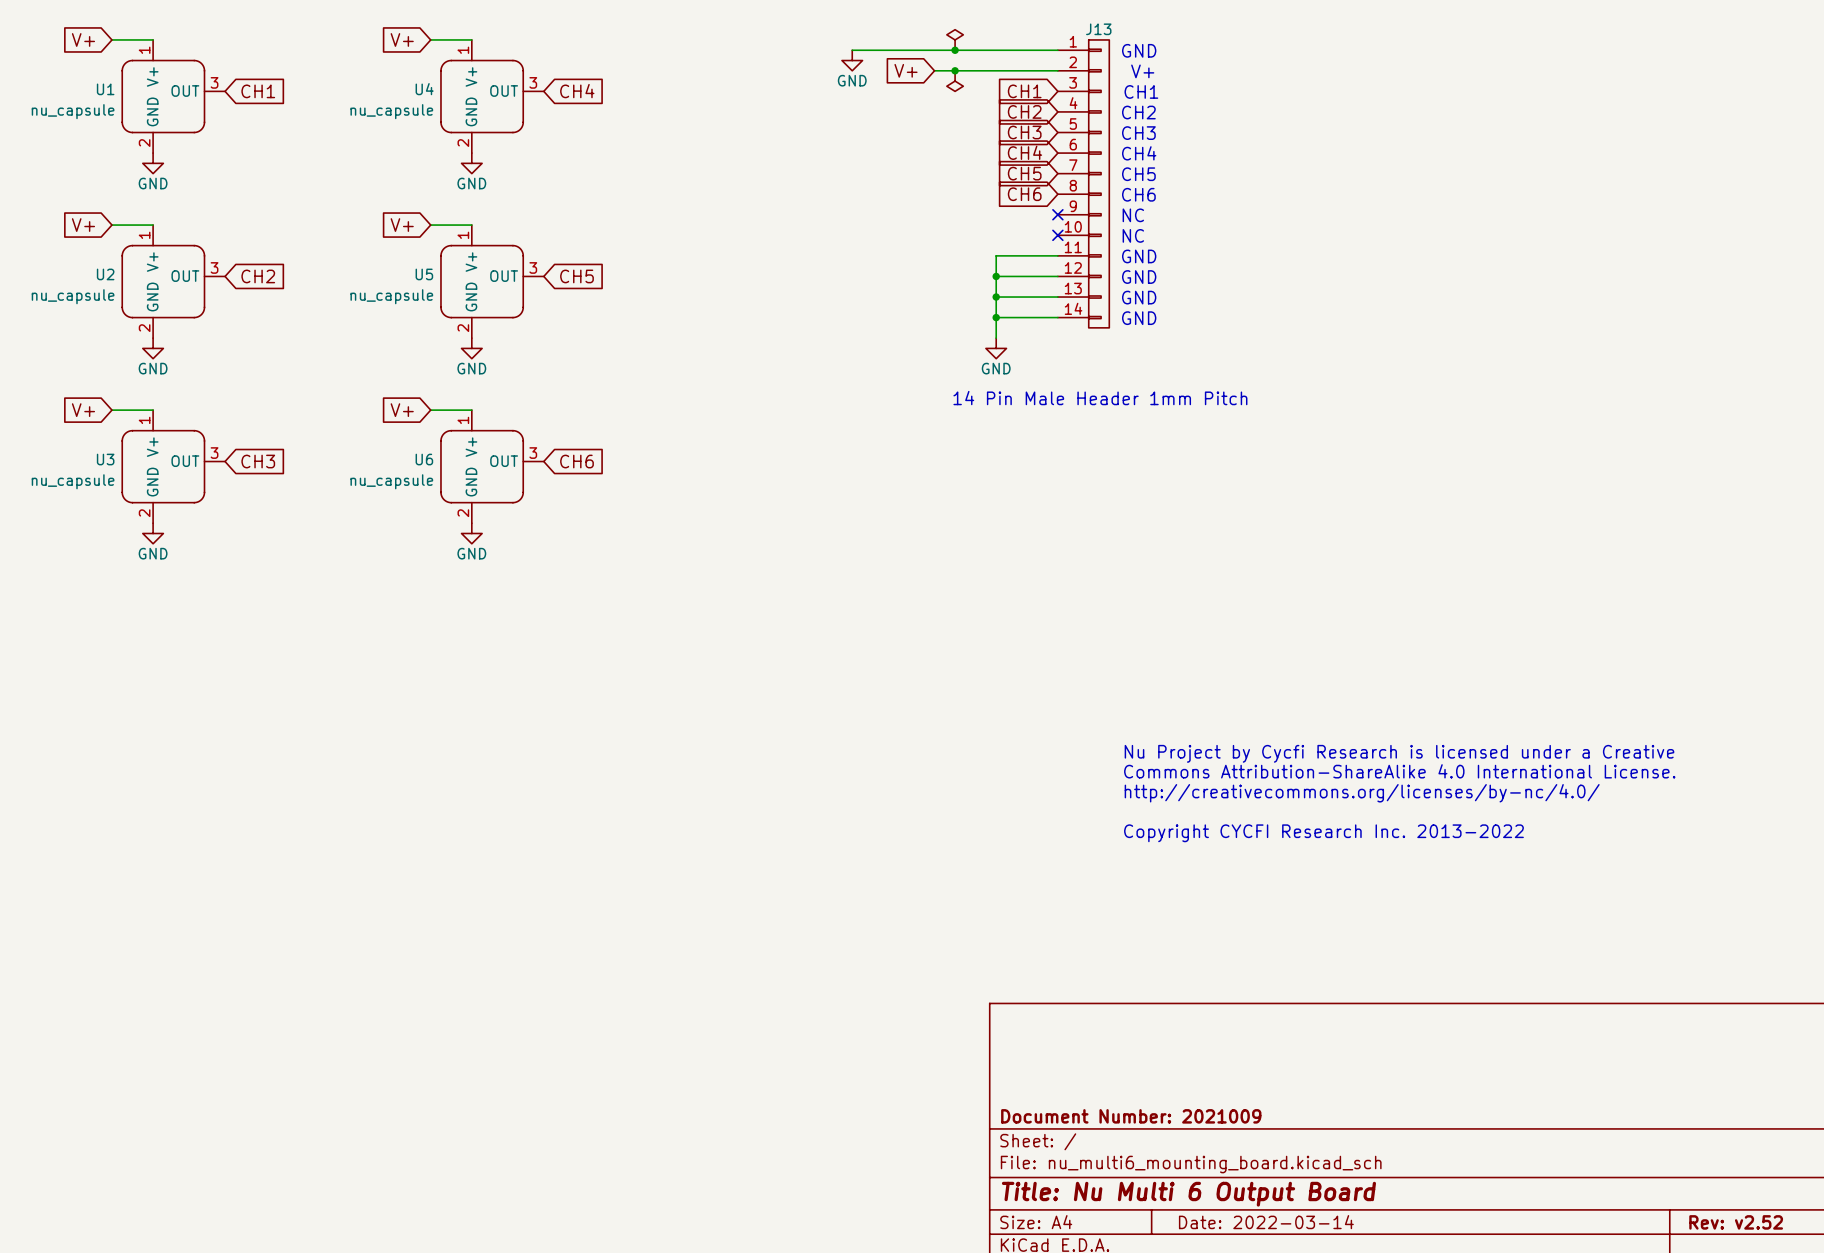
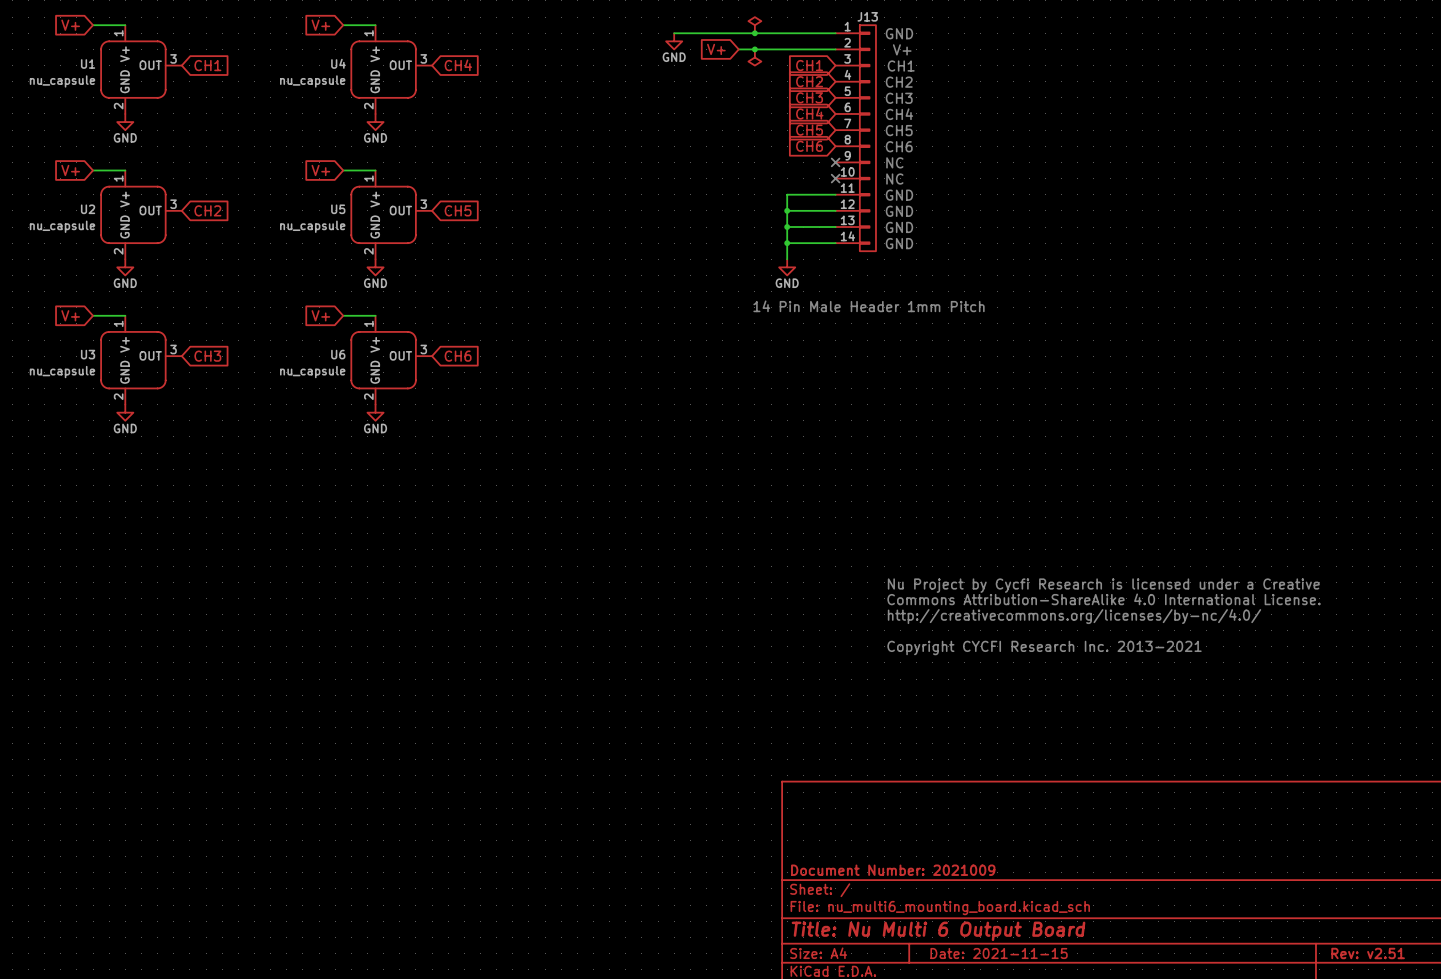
text: Copyright CYCFI Research Inc. 2013-2022 (1323, 833) -> Copyright CYCFI Research Inc. 2013-2021 (1044, 647)
title block: Date: 2022-03-14 (1266, 1222) -> Date: 2021-11-15 (999, 953)
title block: Rev: v2.52 (1736, 1222) -> Rev: v2.51 (1368, 953)

